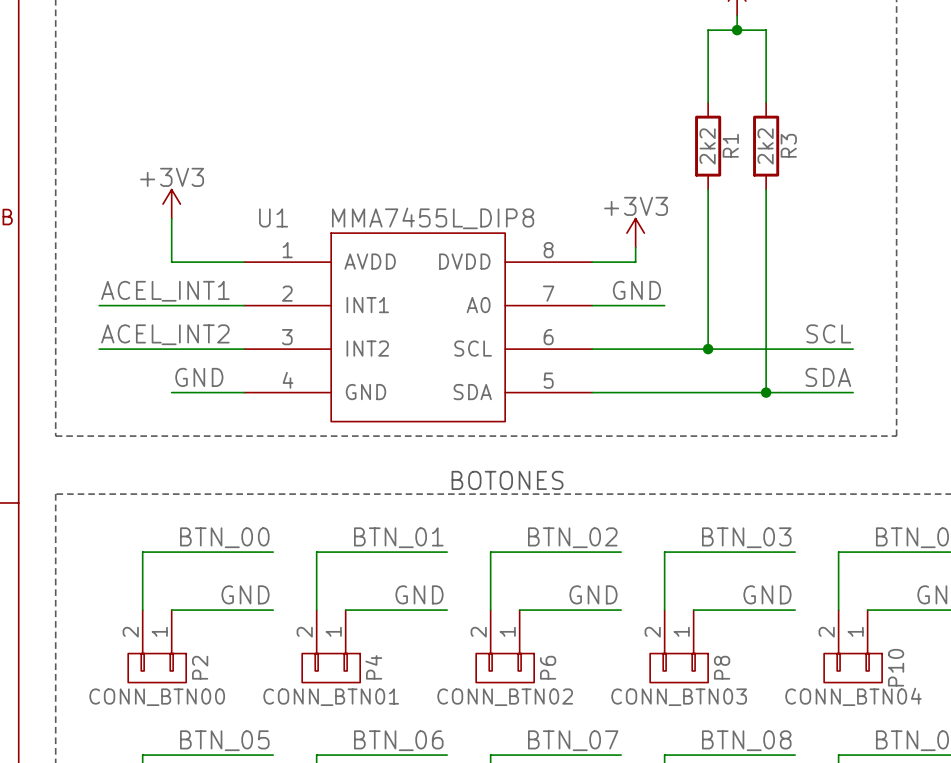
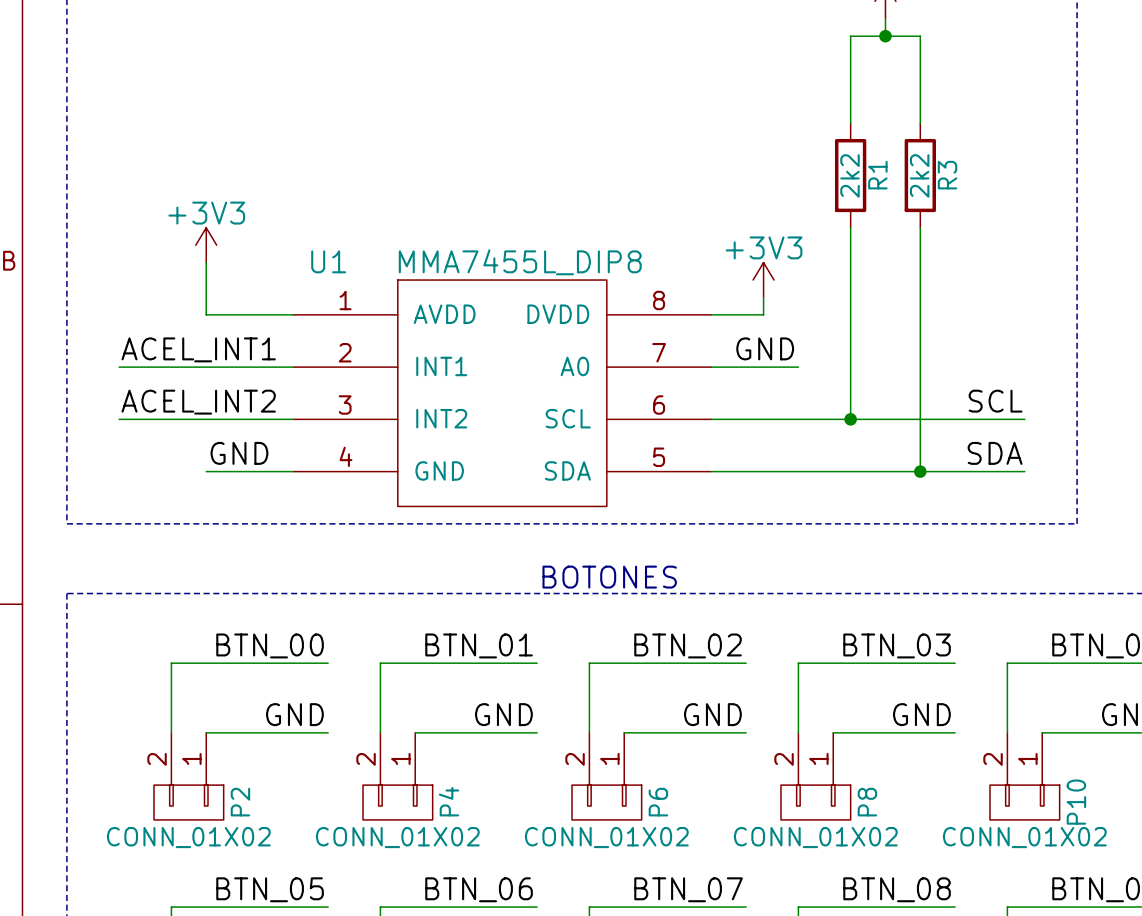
P10 value: CONN_BTN04 (853, 696) -> CONN_01X02 (1024, 837)
P2 value: CONN_BTN00 (157, 697) -> CONN_01X02 (188, 837)
P4 value: CONN_BTN01 (331, 697) -> CONN_01X02 (397, 837)
P6 value: CONN_BTN02 (505, 697) -> CONN_01X02 (606, 837)
P8 value: CONN_BTN03 (679, 697) -> CONN_01X02 (815, 837)

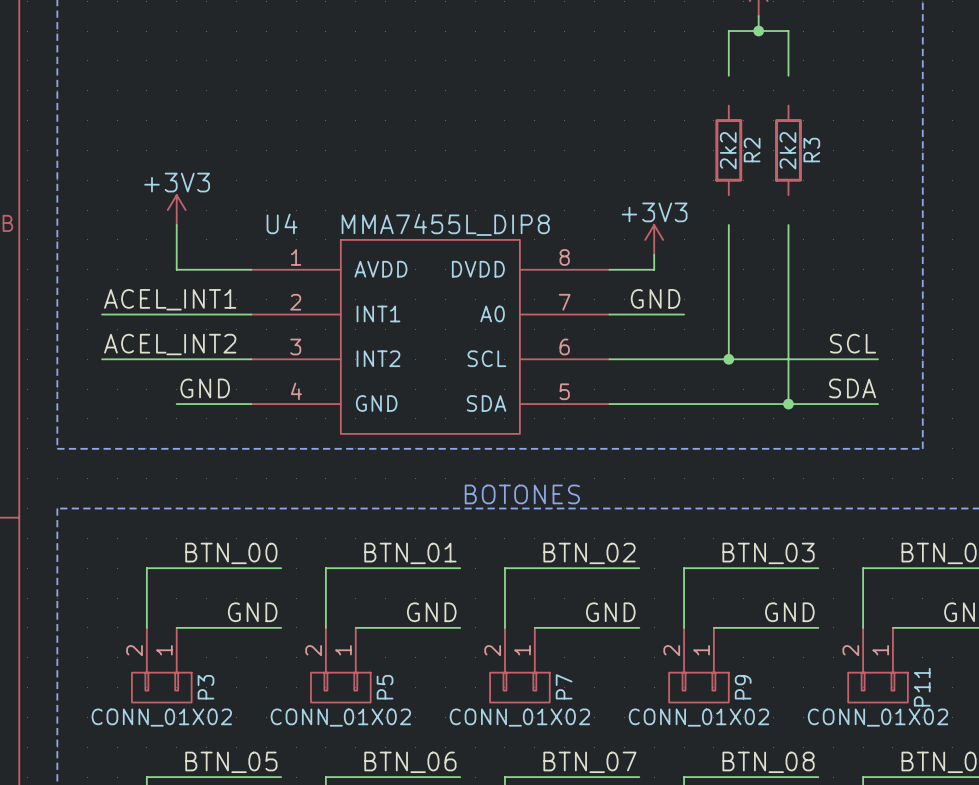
wire: (850, 88) (850, 123) -> none
wire: (920, 88) (920, 123) -> none
R1 name: R1 (877, 175) -> R2 (752, 150)
wire: (850, 227) (850, 262) -> none
wire: (920, 227) (920, 262) -> none
U1 name: U1 (328, 261) -> U4 (282, 223)
P4 name: P4 (449, 801) -> P5 (385, 687)
P2 name: P2 (240, 802) -> P3 (205, 687)
P6 name: P6 (658, 802) -> P7 (564, 686)
P8 name: P8 (867, 802) -> P9 (743, 687)
P10 name: P10 (1076, 802) -> P11 (922, 687)

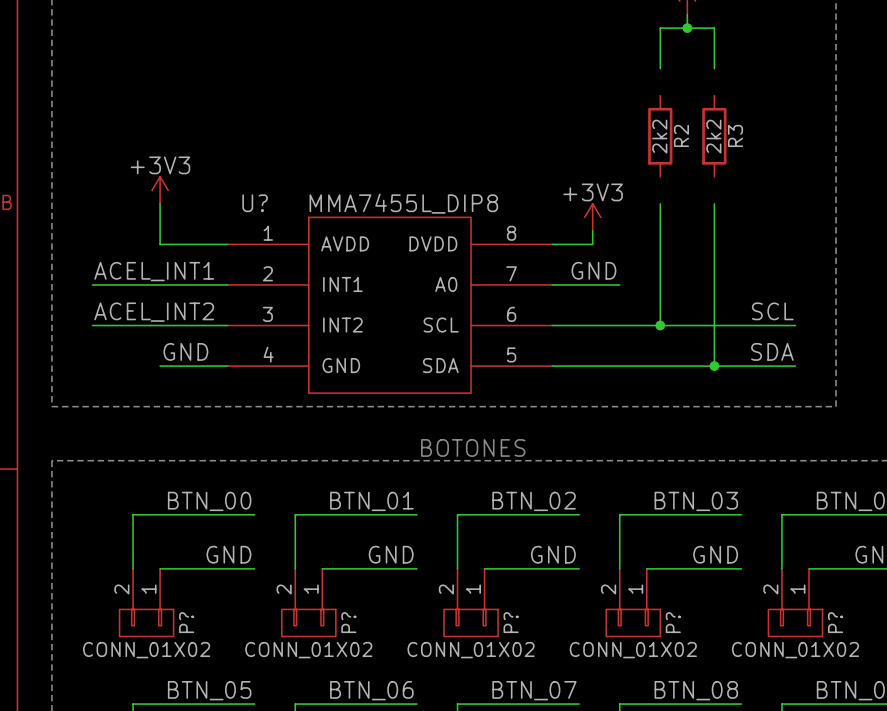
U4 name: U4 (282, 223) -> U? (255, 203)
P7 name: P7 (564, 686) -> P? (511, 622)
P3 name: P3 (205, 687) -> P? (186, 622)
P5 name: P5 (385, 687) -> P? (348, 622)
P9 name: P9 (743, 687) -> P? (673, 622)
P11 name: P11 (922, 687) -> P? (835, 622)

